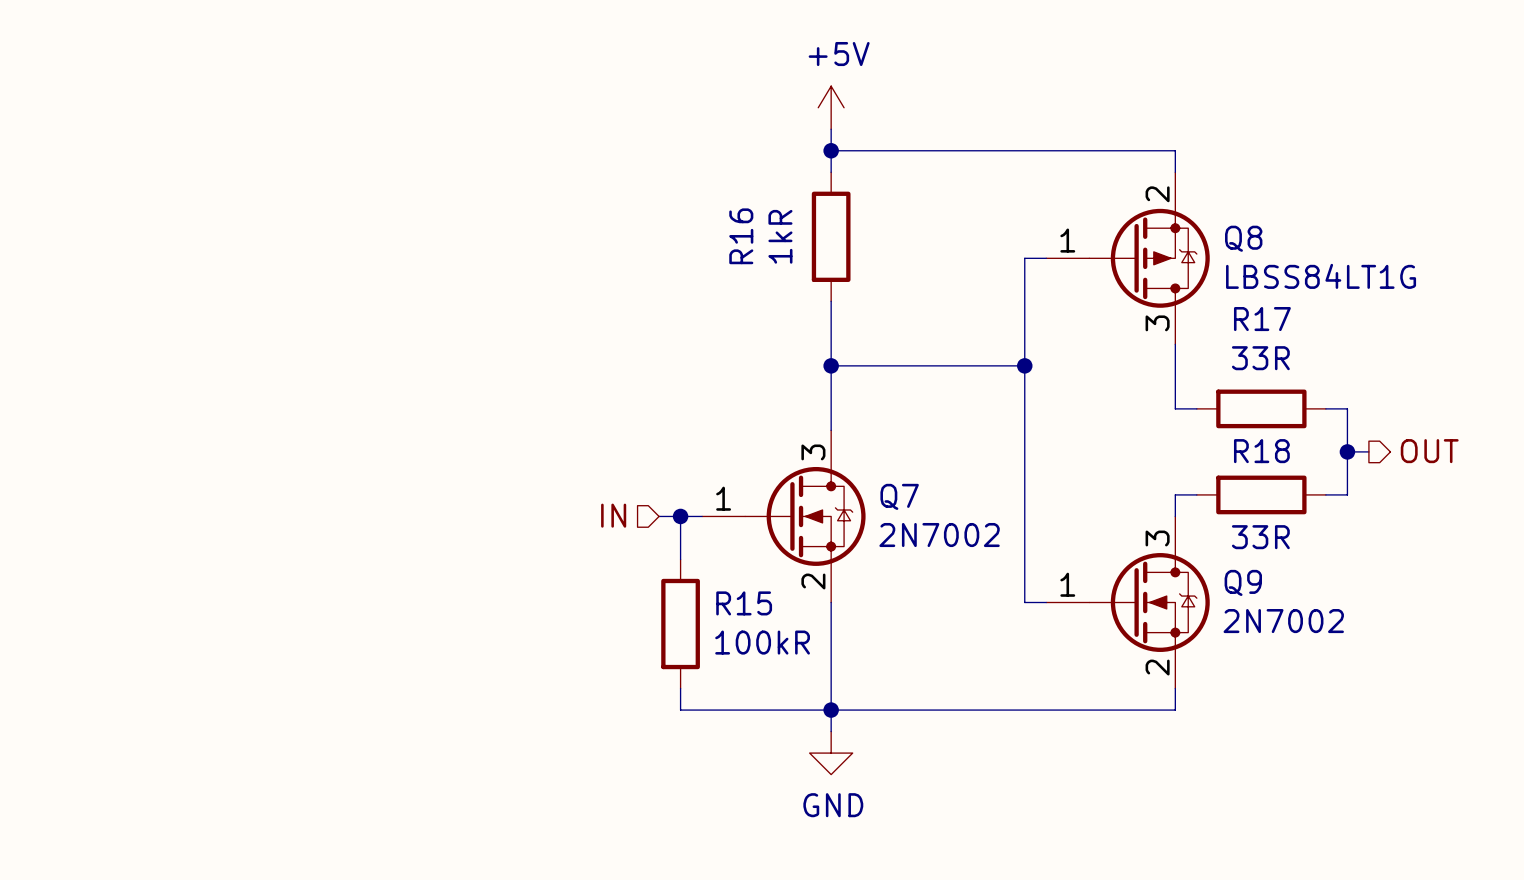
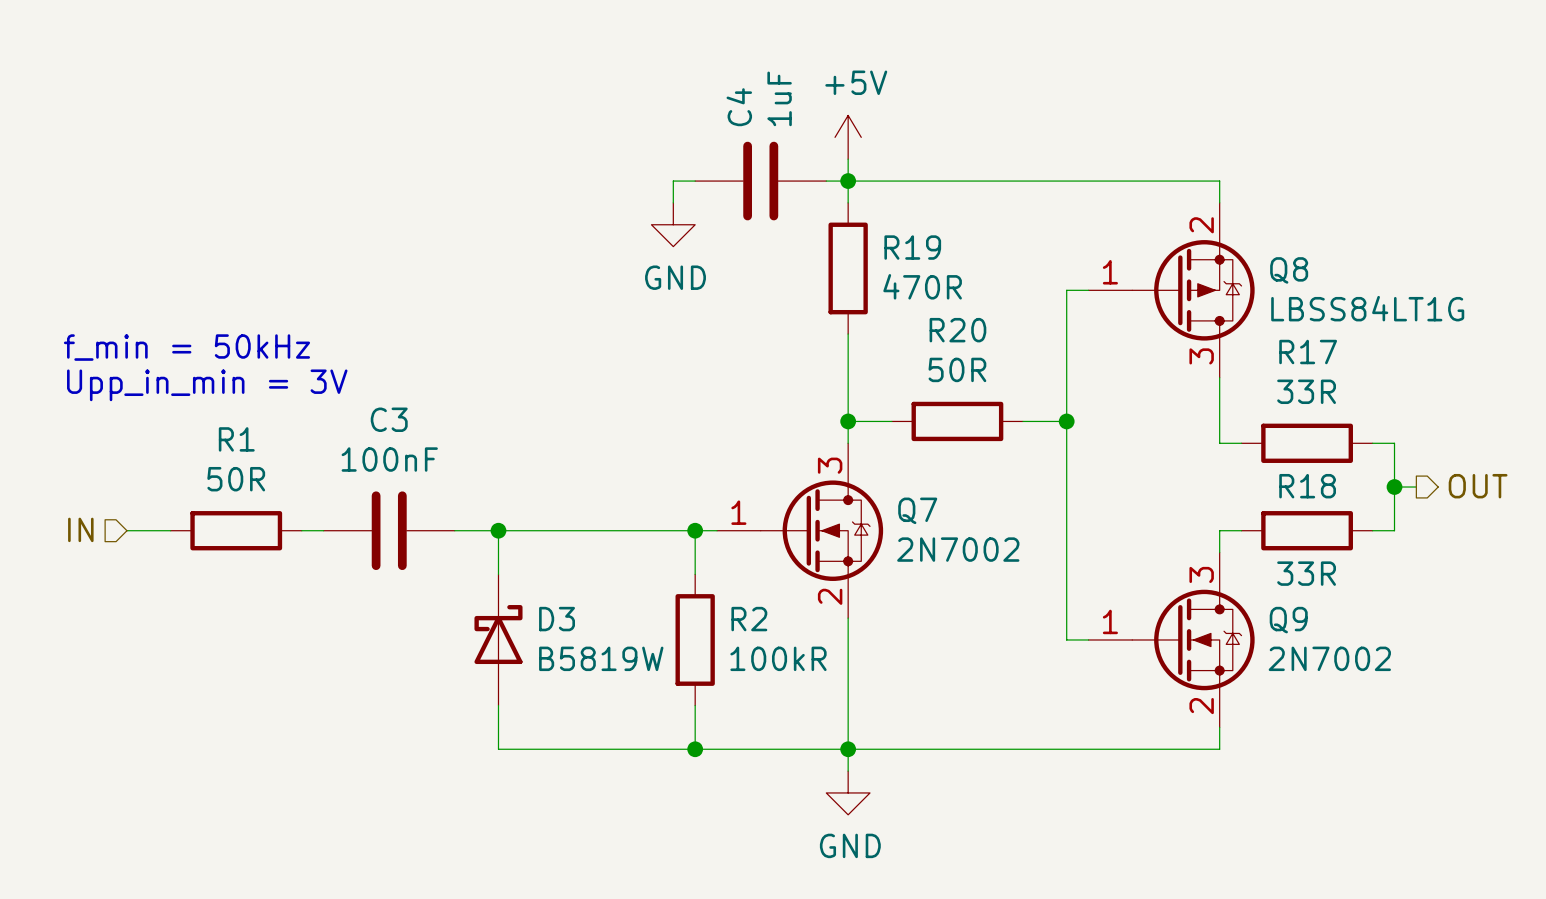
power symbol position: +5V (831, 107) -> +5V (848, 137)
wire: (831, 129) (831, 172) -> (848, 159) (848, 202)
wire: none -> (695, 181) (673, 181) (673, 202)
C4: none -> 1uF (760, 181)
wire: none -> (826, 181) (870, 181)
junction position: (831, 150) -> (848, 181)
power symbol: none -> GND (673, 224)
R19: none -> 470R (848, 268)
R16: 1kR (831, 236) -> none
wire: none -> (848, 334) (848, 443)
wire: (831, 301) (831, 430) -> none
text: none -> f_min = 50kHz (186, 347)
text: none -> Upp_in_min = 3V (207, 385)
wire: (831, 365) (1024, 365) -> none
junction position: (831, 365) -> (848, 421)
junction position: (1024, 365) -> (1066, 421)
R20: none -> 50R (957, 421)
wire: none -> (1022, 421) (1066, 421)
hierarchical label: none -> IN (80, 529)
wire: none -> (126, 530) (170, 530)
R1: none -> 50R (236, 530)
wire: none -> (301, 530) (323, 530)
C3: none -> 100nF (389, 530)
wire: none -> (454, 530) (717, 530)
wire: none -> (498, 530) (498, 574)
junction: none -> (498, 530)
hierarchical label: IN (613, 515) -> none
wire: (659, 516) (702, 516) -> (848, 421) (891, 421)
wire: (680, 516) (680, 559) -> (695, 530) (695, 574)
junction position: (680, 516) -> (695, 530)
Q7 position: (783, 516) -> (800, 530)
wire: none -> (848, 618) (848, 771)
D3: none -> B5819W (498, 639)
R2: none -> 100kR (695, 639)
wire: (831, 602) (831, 731) -> none
R15: 100kR (680, 624) -> none
wire: none -> (695, 705) (695, 749)
wire: (680, 688) (680, 710) -> (498, 705) (498, 749) (717, 749)
junction: none -> (695, 749)
junction position: (831, 710) -> (848, 749)
power symbol position: GND (831, 753) -> GND (848, 792)

